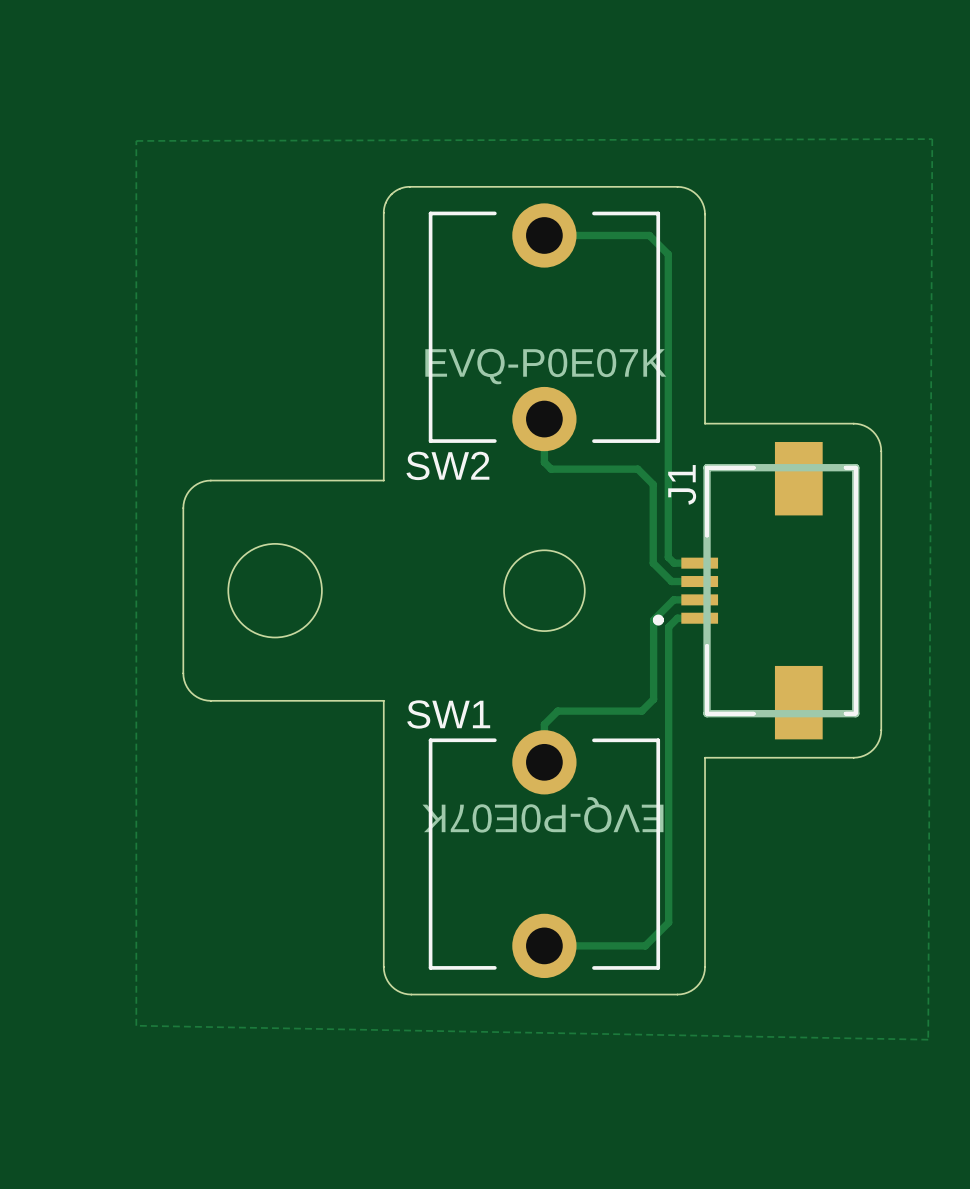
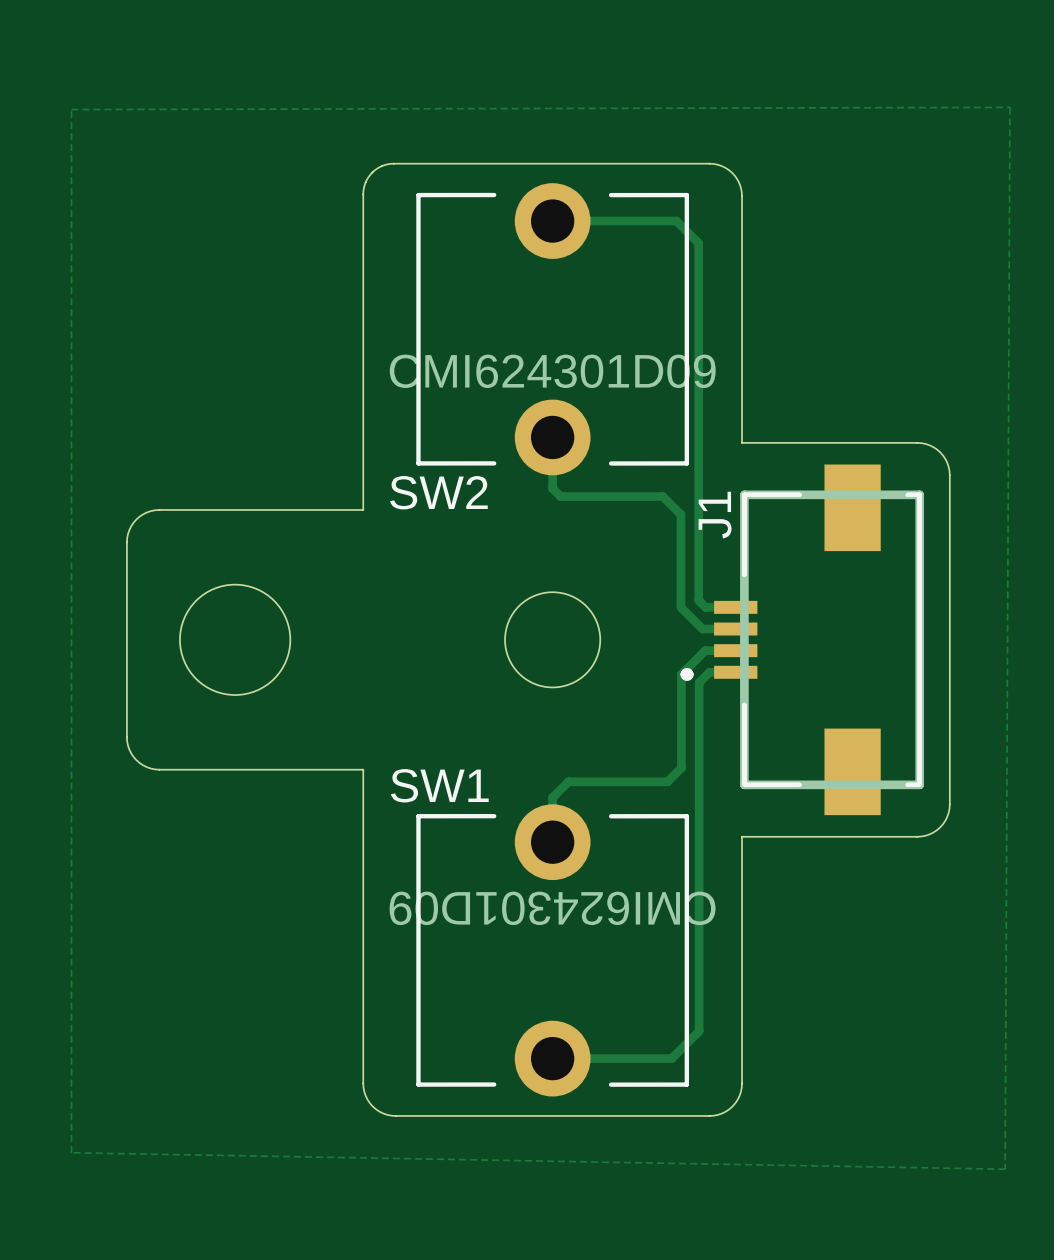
SW2 value: EVQ-P0E07K (545, 366) -> CMI624301D09 (552, 371)
SW1 value: EVQ-P0E07K (542, 814) -> CMI624301D09 (552, 908)

